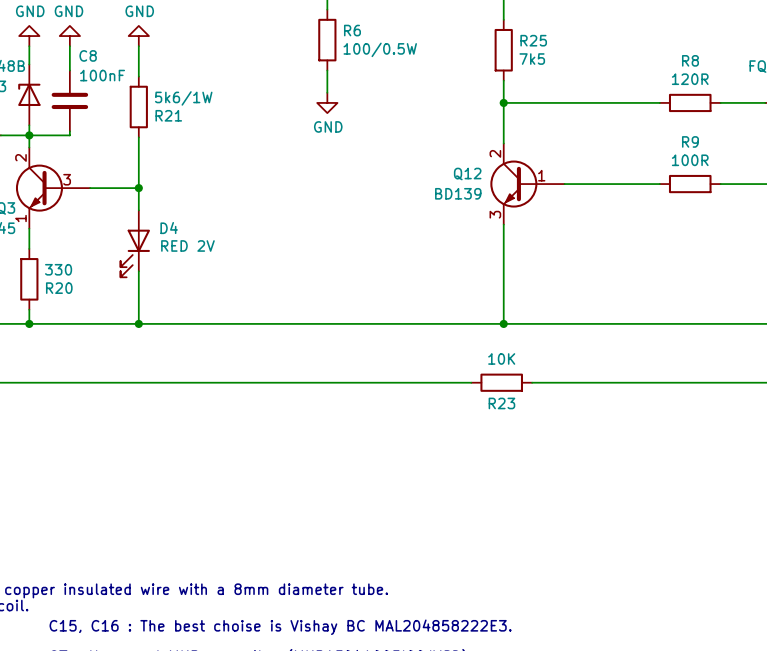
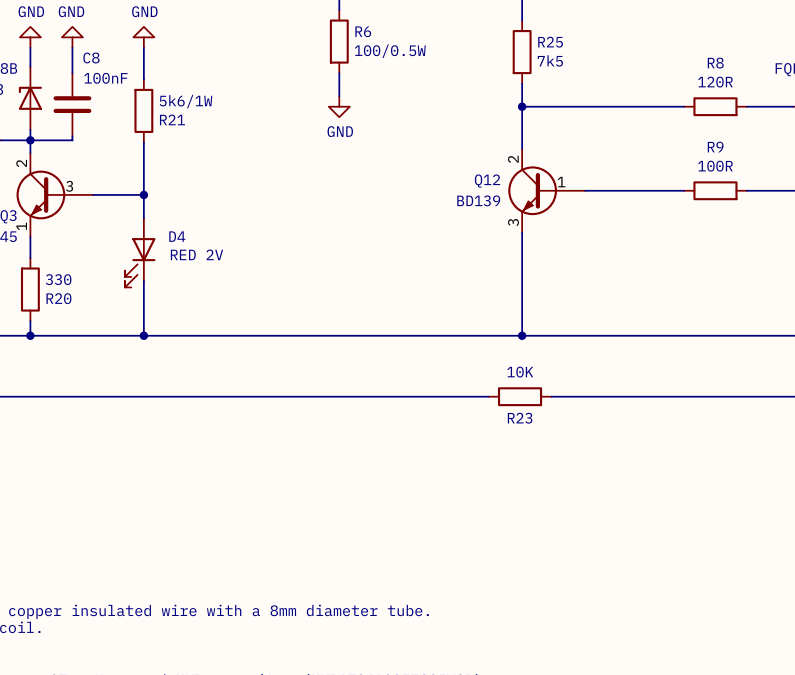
text: C15, C16 : The best choise is Vishay BC MAL204858222E3. (280, 627) -> none

